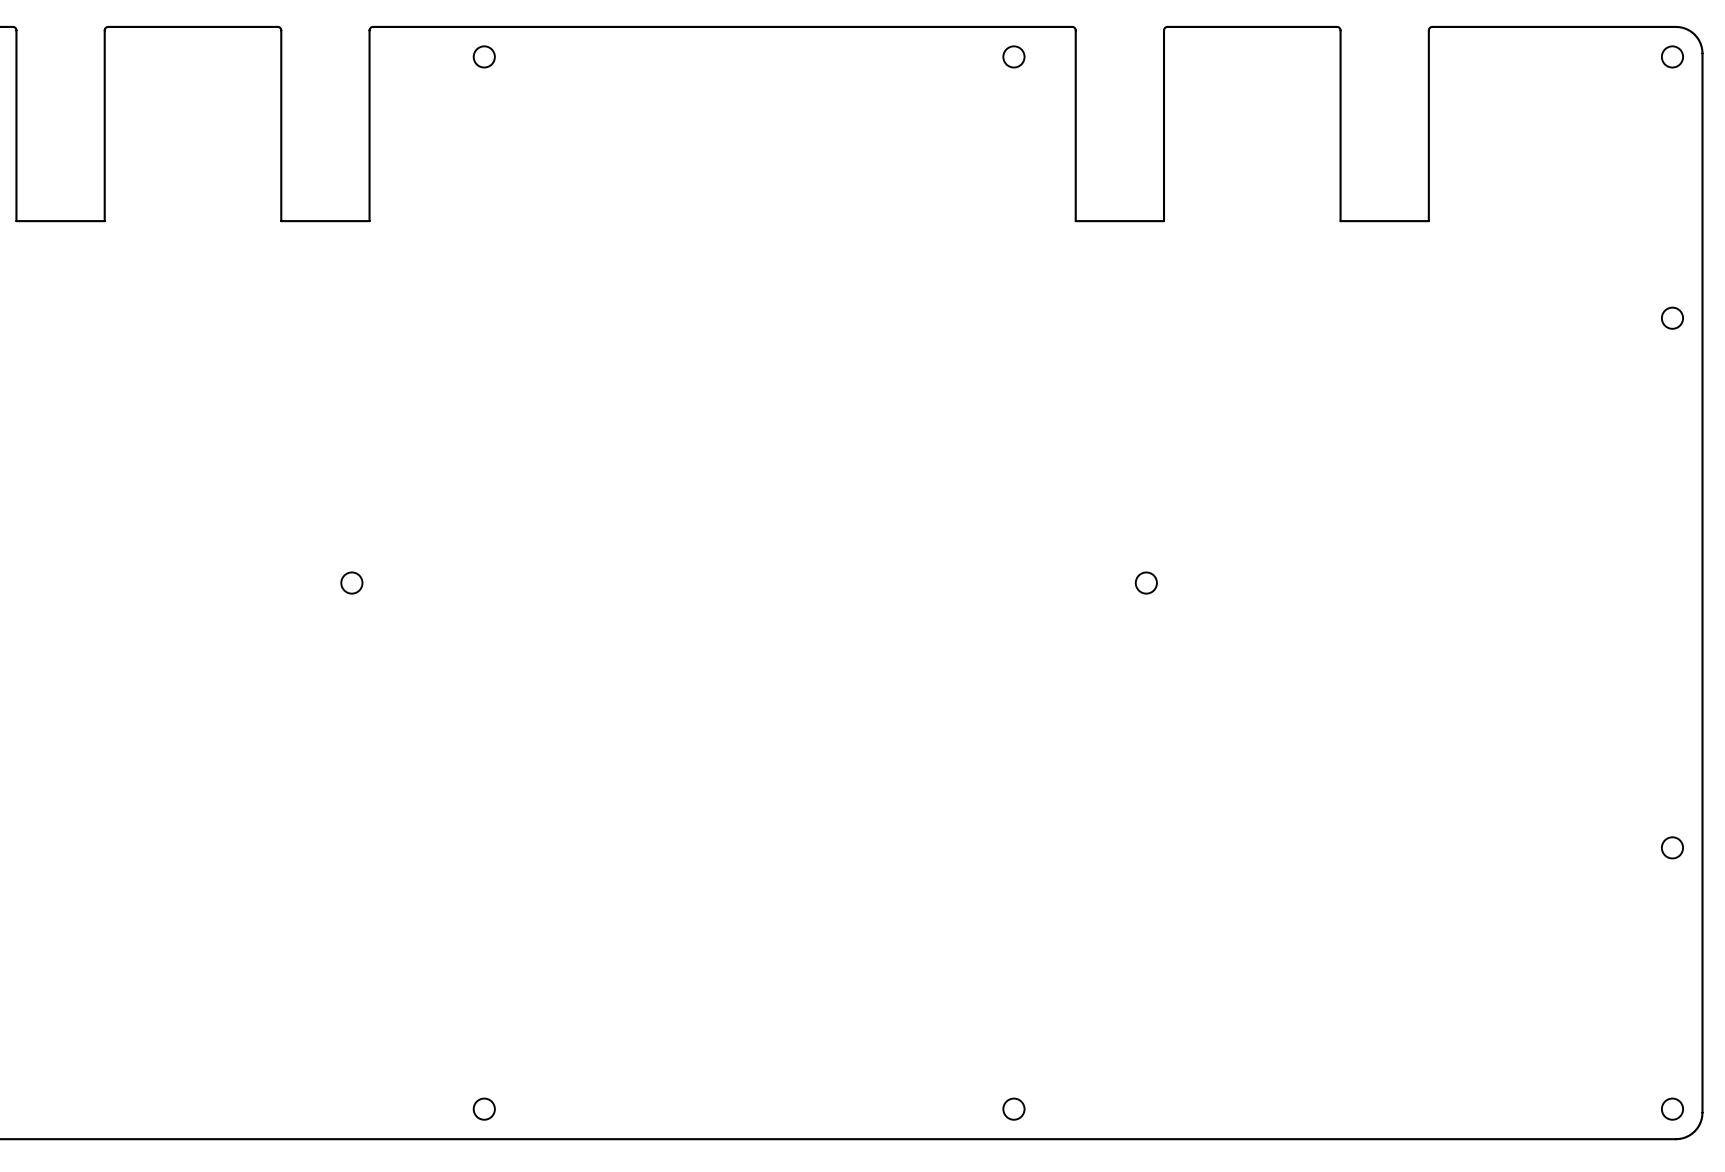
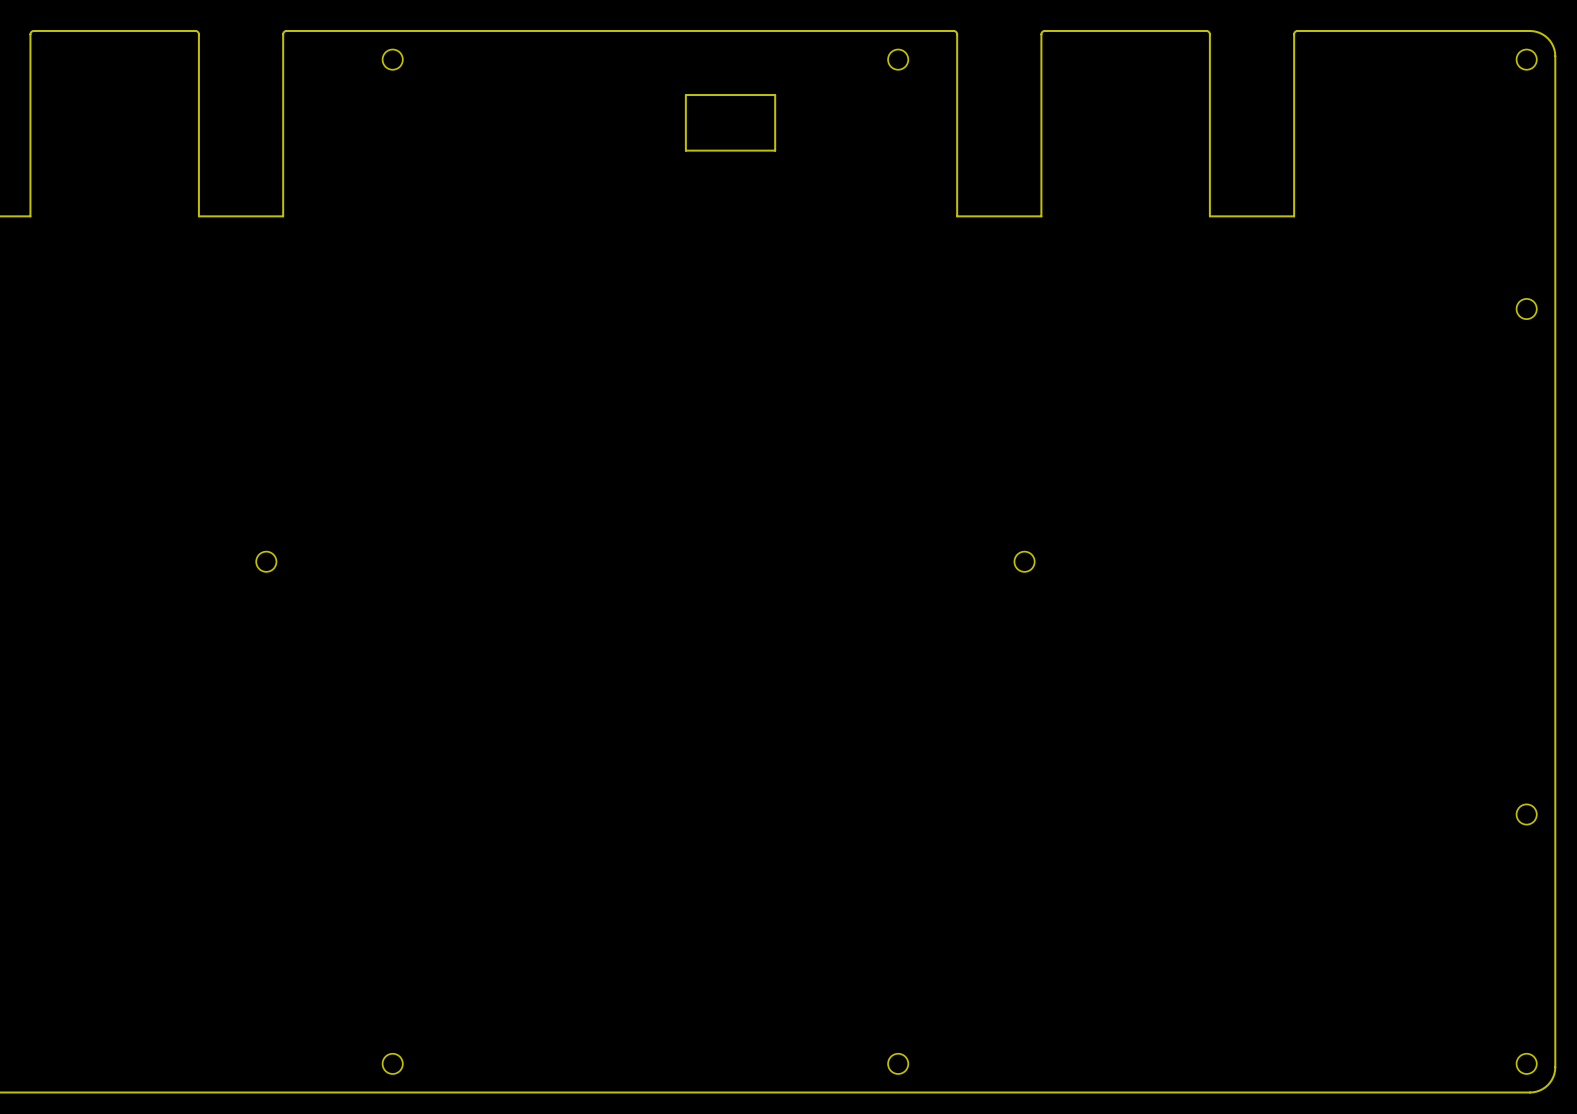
board edge: none -> (685, 95) (685, 150) (775, 150) (775, 95) (685, 95)

